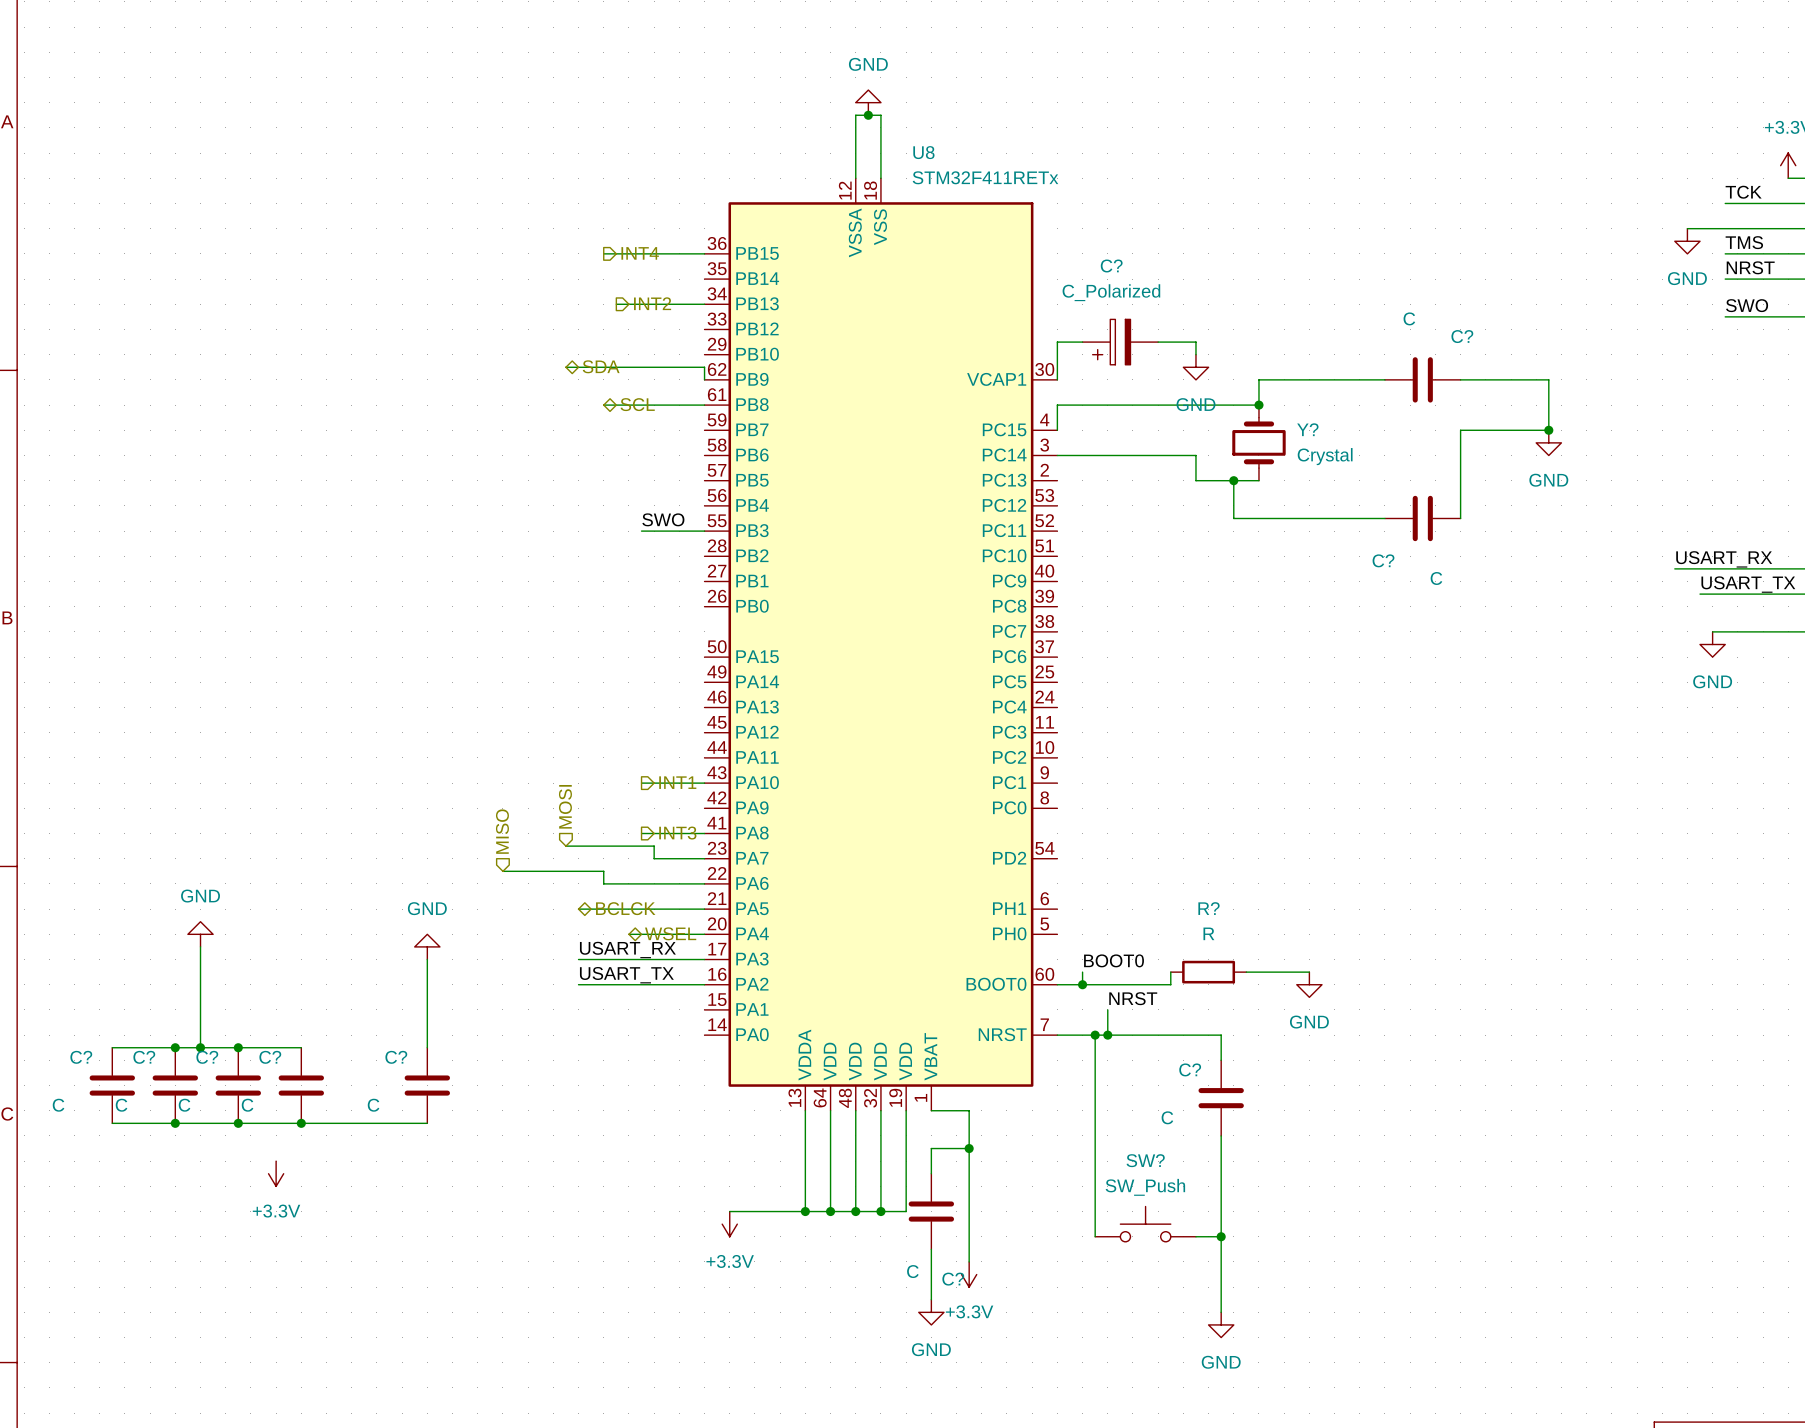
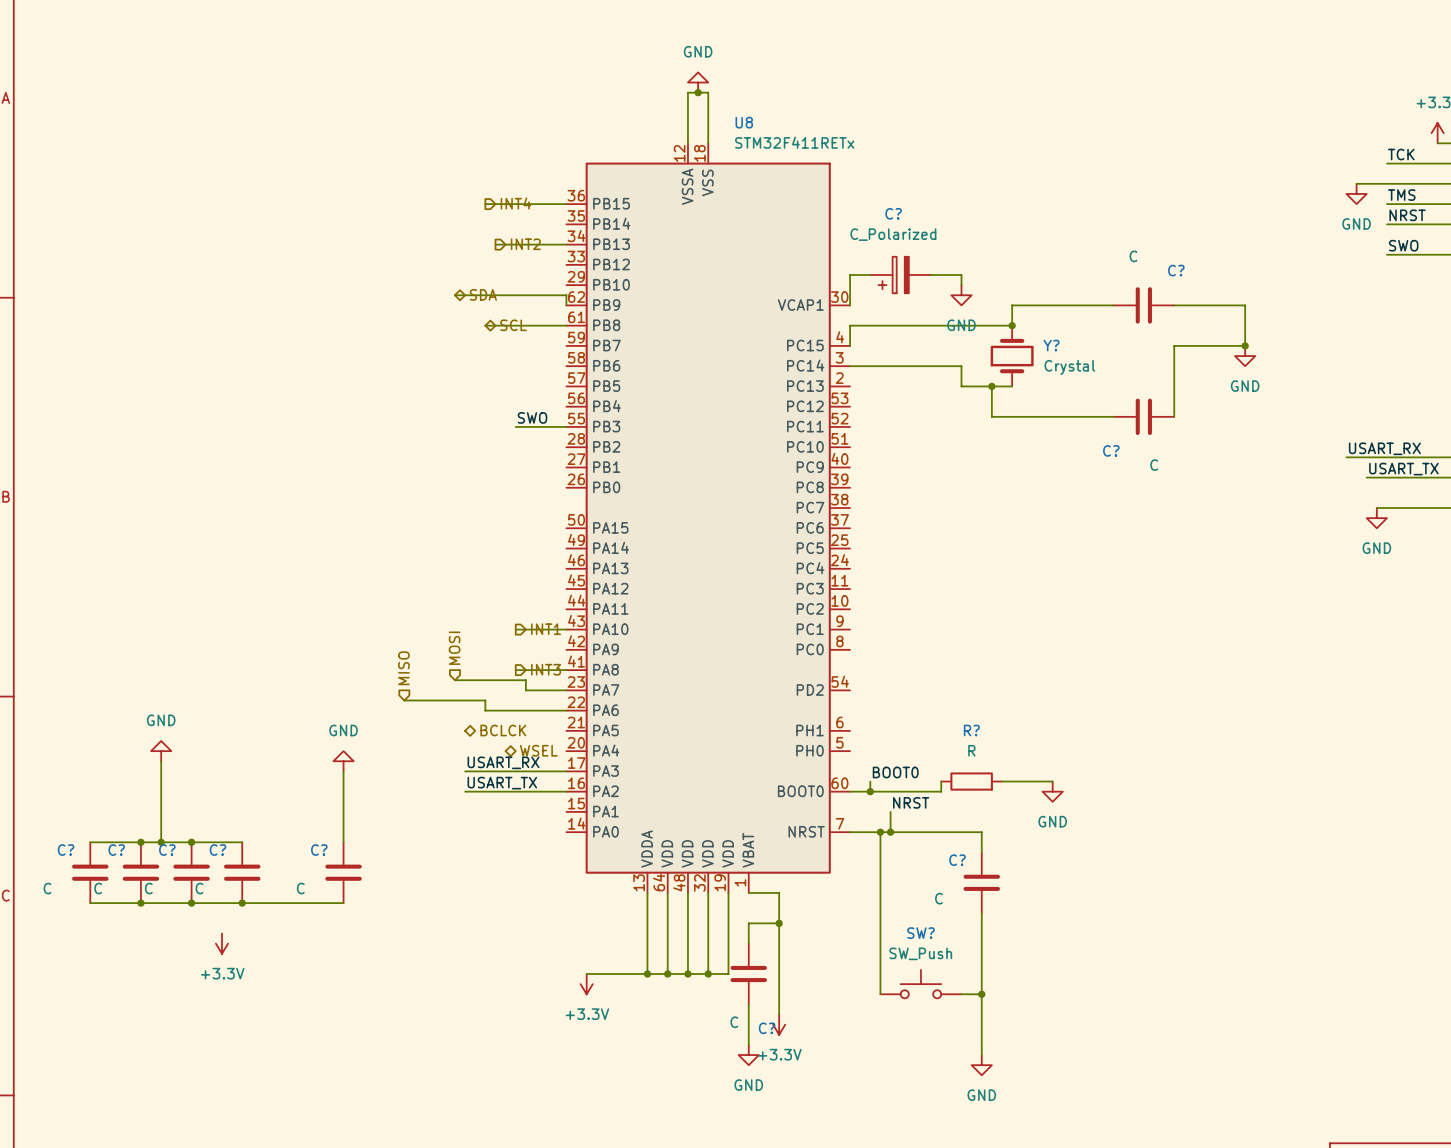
wire: (578, 909) (704, 909) -> none
wire: (628, 934) (704, 934) -> none

